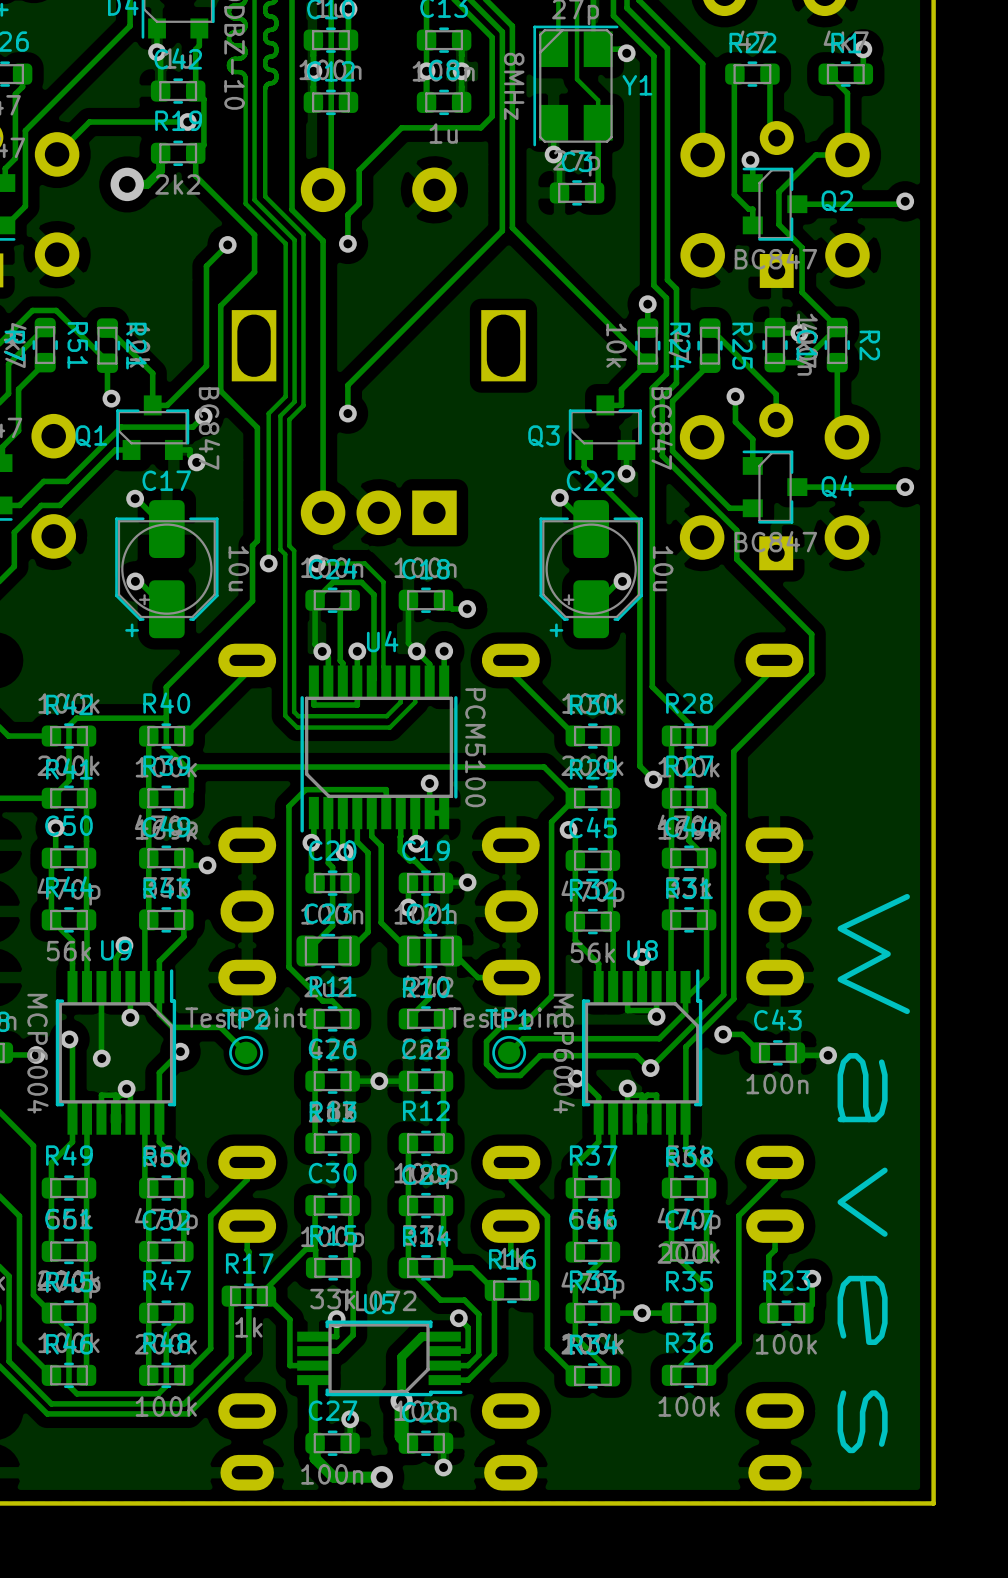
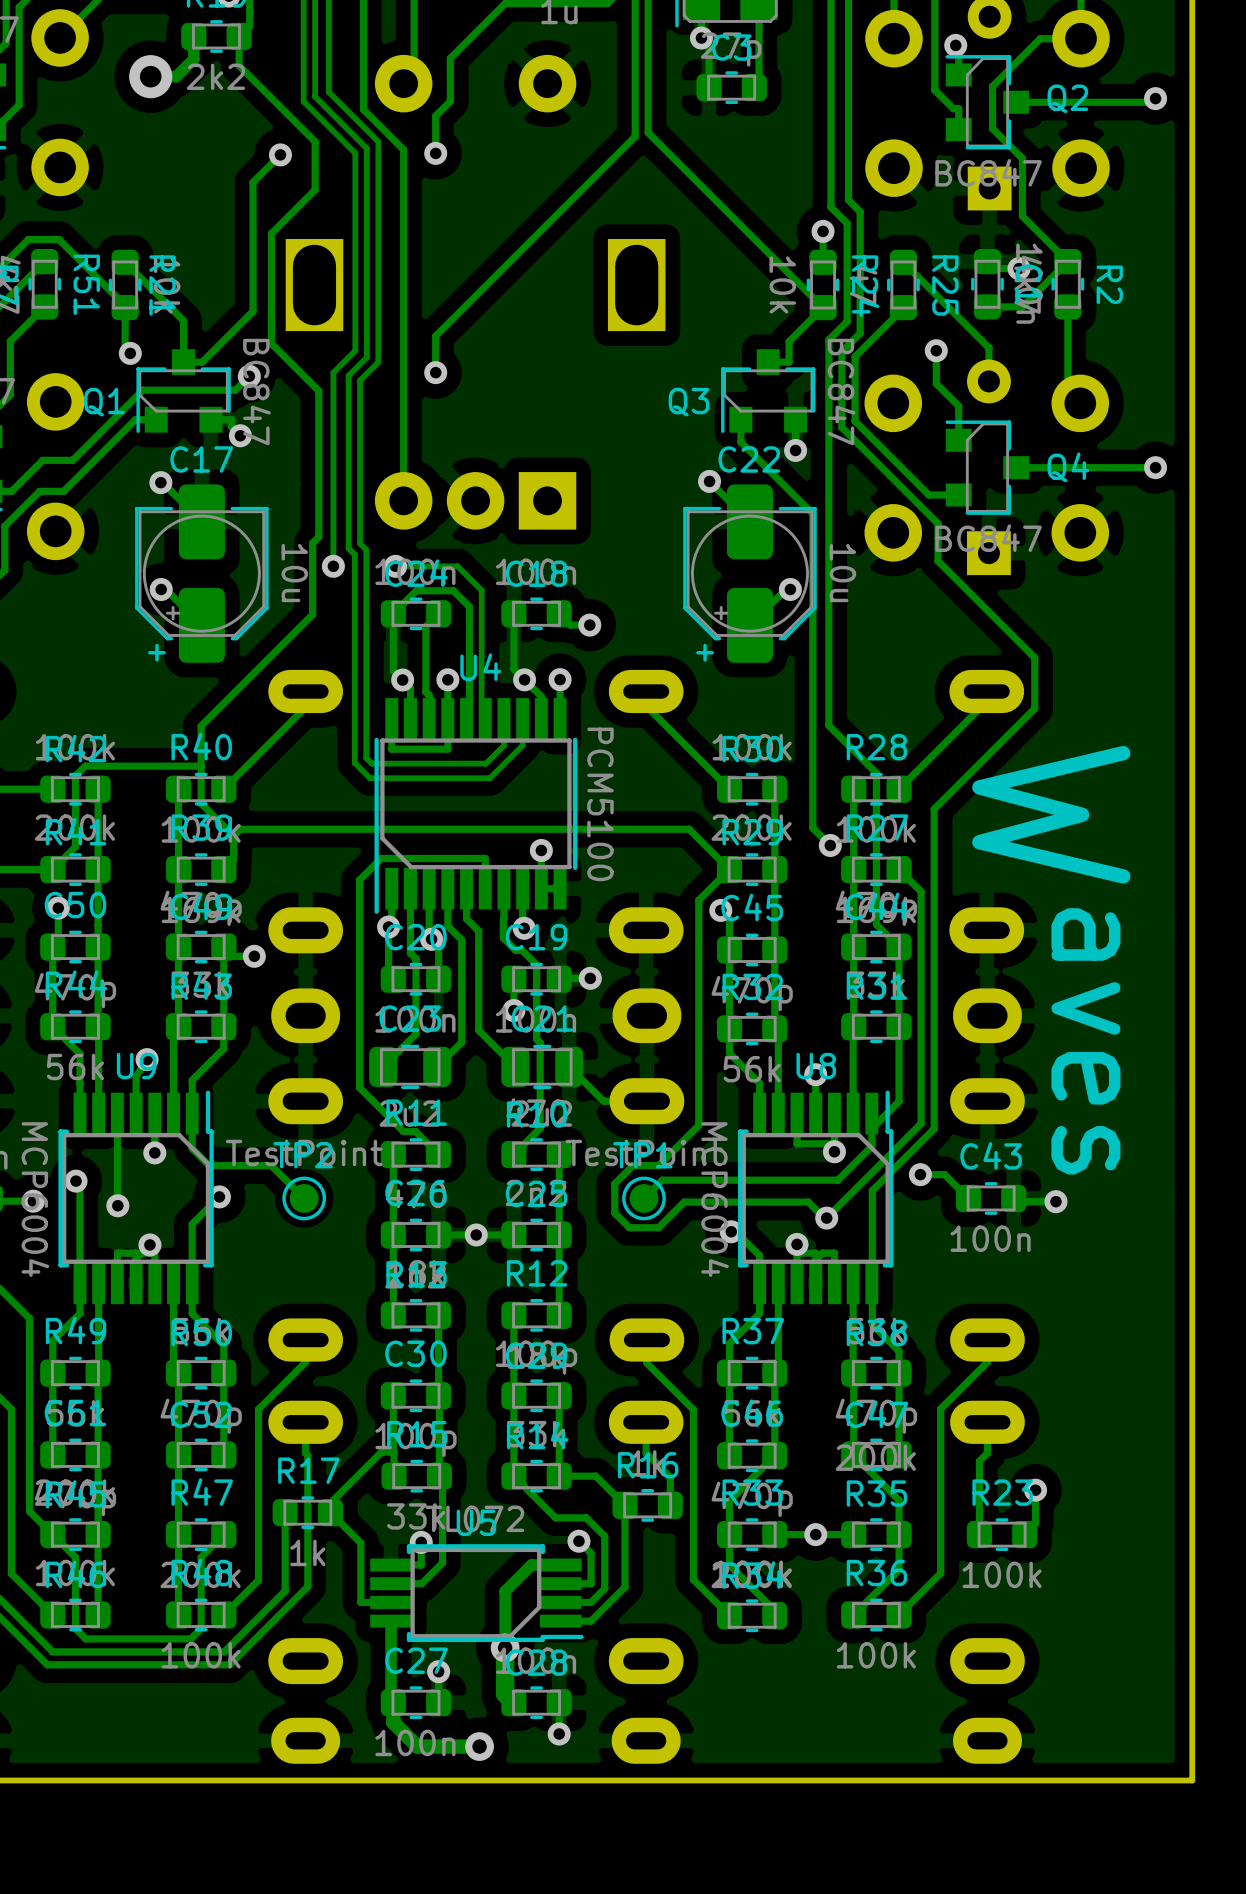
text: none -> W (1051, 814)
text: Waves (873, 1173) -> aves (1085, 1041)

